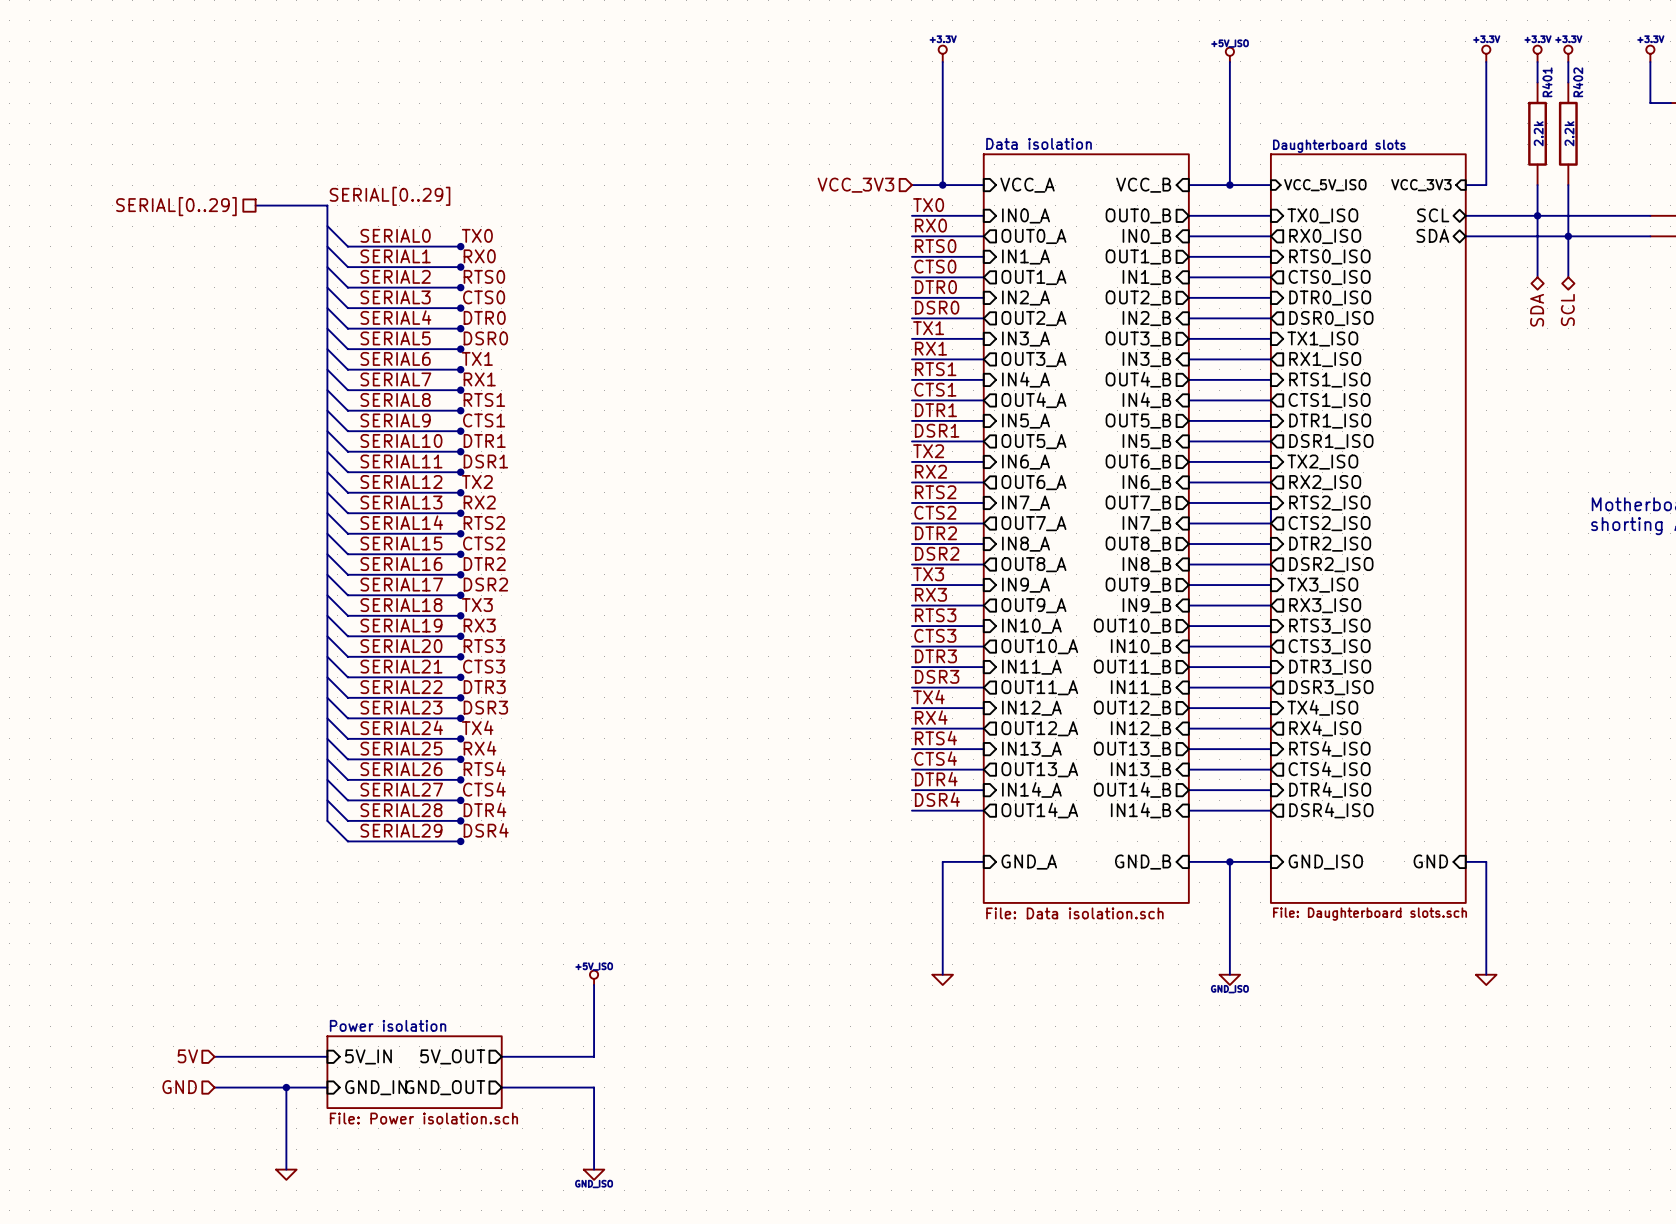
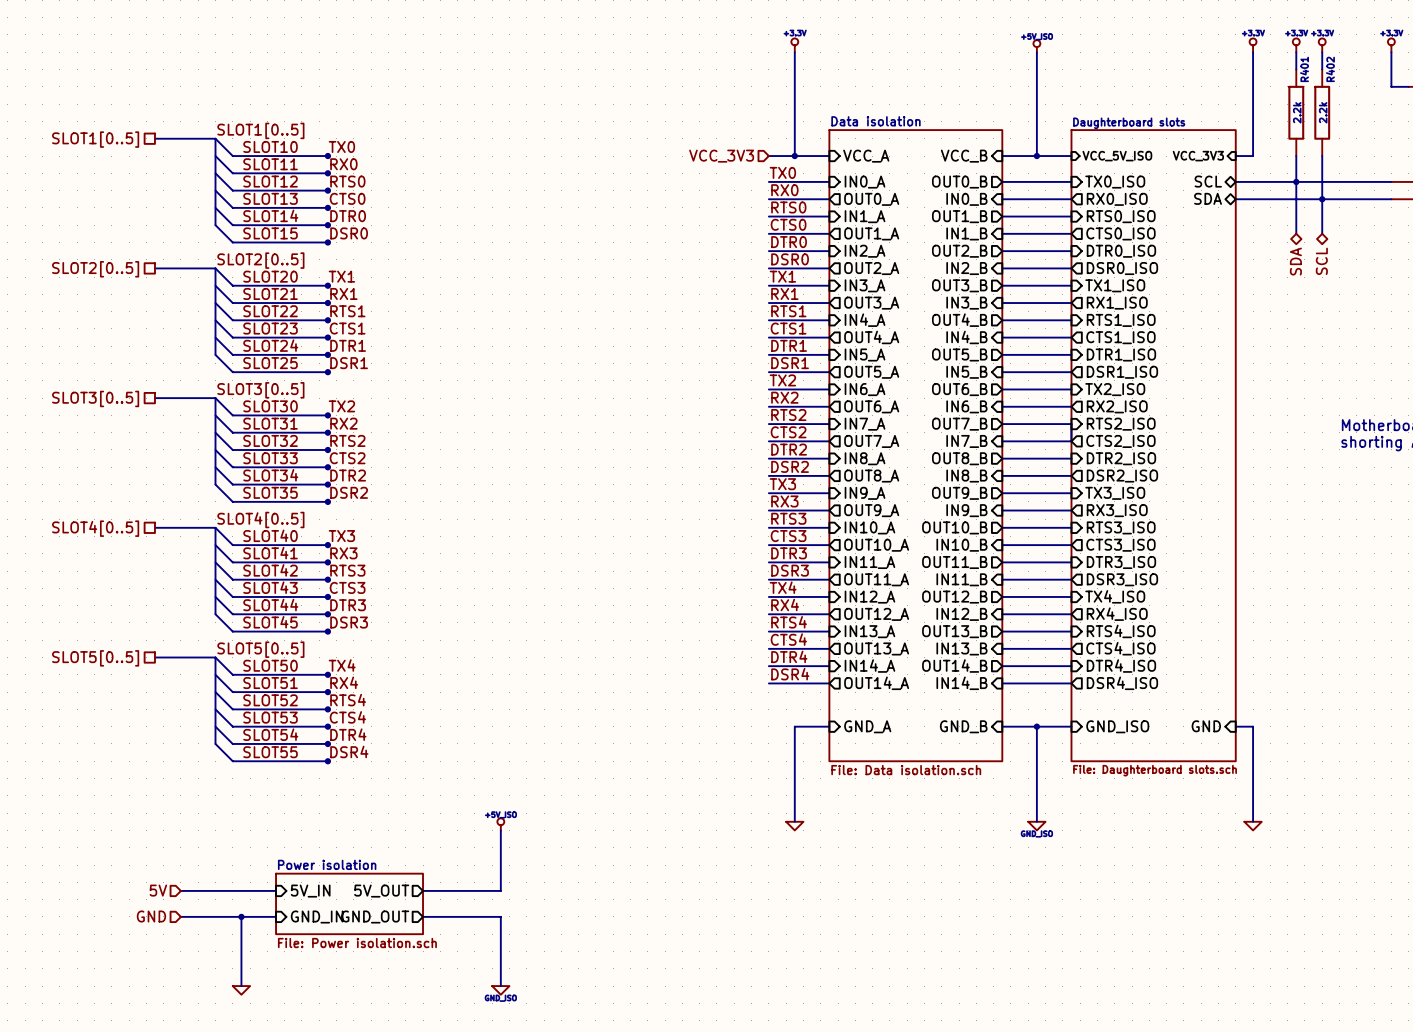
label: none -> SLOT1[0..5] (260, 130)
bus: none -> (154, 138) (215, 138) (215, 225)
hierarchical label: none -> SLOT1[0..5] (95, 139)
label: none -> SLOT10 (270, 146)
wire: none -> (215, 156) (232, 173) (327, 173)
junction: none -> (327, 156)
label: none -> SLOT11 (270, 164)
label: SERIAL[0..29] (390, 196) -> none
wire: none -> (215, 173) (232, 190) (327, 190)
bus: (255, 205) (327, 205) (327, 820) -> none
junction: none -> (327, 173)
hierarchical label: SERIAL[0..29] (176, 206) -> none
label: none -> SLOT12 (270, 181)
wire: (327, 226) (347, 246) -> (215, 190) (232, 207) (293, 207)
junction: none -> (327, 190)
label: none -> SLOT13 (270, 198)
label: SERIAL0 (395, 235) -> none
label position: TX0 (477, 235) -> TX0 (341, 146)
wire: (327, 246) (347, 267) -> (215, 207) (232, 225) (293, 225)
wire: (388, 246) (460, 246) -> none
junction: none -> (327, 207)
junction: (460, 246) -> none
label: none -> SLOT14 (270, 215)
label: SERIAL1 (395, 256) -> none
label position: RX0 (479, 256) -> RX0 (343, 164)
wire: (327, 267) (347, 287) -> (215, 225) (232, 242) (293, 242)
wire: (388, 267) (460, 267) -> none
junction: none -> (327, 225)
junction: (460, 267) -> none
label: none -> SLOT15 (270, 233)
label: SERIAL2 (395, 276) -> none
label position: RTS0 (484, 276) -> RTS0 (347, 181)
wire: (327, 287) (347, 308) (460, 308) -> (215, 138) (232, 156) (327, 156)
wire: (388, 287) (460, 287) -> none
junction: none -> (327, 242)
junction: (460, 287) -> none
label: SERIAL3 (395, 297) -> none
label position: CTS0 (484, 297) -> CTS0 (347, 198)
wire: (327, 308) (347, 328) (460, 328) -> (215, 268) (232, 285) (327, 285)
junction: (460, 308) -> none
label: none -> SLOT2[0..5] (260, 260)
label: SERIAL4 (395, 317) -> none
label position: DTR0 (484, 317) -> DTR0 (348, 216)
bus: none -> (154, 268) (215, 268) (215, 354)
hierarchical label: none -> SLOT2[0..5] (95, 269)
label: none -> SLOT20 (270, 276)
wire: (327, 328) (347, 349) (460, 349) -> (215, 285) (232, 303) (327, 303)
junction: (460, 328) -> none
junction: none -> (327, 285)
label: SERIAL5 (395, 338) -> none
label position: DSR0 (485, 338) -> DSR0 (349, 233)
label: none -> SLOT21 (270, 293)
wire: (327, 349) (347, 369) (460, 369) -> (215, 303) (232, 320) (327, 320)
junction: (460, 349) -> none
label: SERIAL6 (395, 358) -> none
label position: TX1 (477, 358) -> TX1 (341, 276)
junction: none -> (327, 303)
label: none -> SLOT22 (270, 311)
wire: (327, 369) (347, 390) (460, 390) -> (215, 320) (232, 337) (327, 337)
junction: (460, 369) -> none
junction: none -> (327, 320)
label: SERIAL7 (395, 379) -> none
label position: RX1 (479, 379) -> RX1 (343, 293)
label: none -> SLOT23 (270, 328)
wire: (327, 390) (347, 410) (460, 410) -> (215, 337) (232, 354) (327, 354)
junction: (460, 390) -> none
label: SERIAL8 (395, 399) -> none
label position: RTS1 (484, 399) -> RTS1 (347, 311)
junction: none -> (327, 337)
label: none -> SLOT24 (270, 345)
wire: (327, 410) (347, 431) (460, 431) -> (215, 354) (232, 372) (327, 372)
junction: (460, 410) -> none
junction: none -> (327, 354)
label: SERIAL9 (395, 420) -> none
label position: CTS1 (484, 420) -> CTS1 (347, 328)
label: none -> SLOT25 (270, 363)
wire: (327, 431) (347, 451) (460, 451) -> none
junction: (460, 431) -> none
label: SERIAL10 (401, 440) -> none
label position: DTR1 (484, 440) -> DTR1 (348, 345)
junction: none -> (327, 372)
wire: (327, 451) (347, 472) (460, 472) -> none
junction: (460, 451) -> none
label: SERIAL11 (401, 461) -> none
label position: DSR1 (485, 461) -> DSR1 (349, 363)
label: none -> SLOT3[0..5] (260, 390)
bus: none -> (154, 398) (215, 398) (215, 484)
wire: (327, 472) (347, 492) -> (215, 398) (232, 415) (293, 415)
junction: (460, 472) -> none
hierarchical label: none -> SLOT3[0..5] (95, 398)
label: none -> SLOT30 (270, 406)
label: SERIAL12 (401, 481) -> none
label position: TX2 (477, 481) -> TX2 (341, 406)
wire: (327, 492) (347, 513) -> (215, 415) (232, 432) (293, 432)
wire: (388, 492) (460, 492) -> none
junction: none -> (327, 415)
junction: (460, 492) -> none
label: none -> SLOT31 (270, 423)
label: SERIAL13 (401, 502) -> none
label position: RX2 (479, 502) -> RX2 (343, 423)
wire: (327, 513) (347, 533) -> (215, 432) (232, 449) (293, 449)
wire: (388, 513) (460, 513) -> none
junction: none -> (327, 432)
junction: (460, 513) -> none
label: SERIAL14 (401, 522) -> none
label: none -> SLOT32 (270, 440)
label position: RTS2 (484, 523) -> RTS2 (347, 440)
wire: (327, 533) (347, 554) -> (215, 449) (232, 467) (293, 467)
wire: (388, 533) (460, 533) -> none
junction: none -> (327, 449)
junction: (460, 533) -> none
label: none -> SLOT33 (270, 458)
label: SERIAL15 (401, 543) -> none
label position: CTS2 (484, 543) -> CTS2 (347, 458)
wire: (327, 554) (347, 574) -> (215, 467) (232, 484) (293, 484)
wire: (388, 554) (460, 554) -> none
junction: none -> (327, 467)
junction: (460, 554) -> none
label: none -> SLOT34 (270, 475)
label: SERIAL16 (401, 564) -> none
label position: DTR2 (484, 564) -> DTR2 (348, 475)
wire: (327, 574) (347, 595) -> (215, 484) (232, 501) (293, 501)
wire: (388, 574) (460, 574) -> none
junction: none -> (327, 484)
junction: (460, 574) -> none
label: none -> SLOT35 (270, 492)
label: SERIAL17 (401, 584) -> none
label position: DSR2 (485, 584) -> DSR2 (349, 492)
wire: (327, 595) (347, 615) (460, 615) -> none
wire: (388, 595) (460, 595) -> none
junction: none -> (327, 501)
junction: (460, 595) -> none
label: SERIAL18 (401, 605) -> none
label position: TX3 (477, 605) -> TX3 (341, 536)
wire: (327, 615) (347, 636) (460, 636) -> (215, 527) (232, 545) (327, 545)
junction: (460, 615) -> none
label: none -> SLOT4[0..5] (260, 519)
label: SERIAL19 (401, 625) -> none
label position: RX3 (479, 625) -> RX3 (343, 553)
bus: none -> (154, 527) (215, 527) (215, 614)
hierarchical label: none -> SLOT4[0..5] (95, 528)
label: none -> SLOT40 (270, 535)
wire: (327, 636) (347, 656) (460, 656) -> (215, 545) (232, 562) (327, 562)
junction: (460, 636) -> none
junction: none -> (327, 545)
label: SERIAL20 (401, 646) -> none
label position: RTS3 (484, 646) -> RTS3 (347, 570)
label: none -> SLOT41 (270, 553)
wire: (327, 656) (347, 677) (460, 677) -> (215, 562) (232, 579) (327, 579)
junction: (460, 656) -> none
label: SERIAL21 (401, 666) -> none
label position: CTS3 (484, 666) -> CTS3 (347, 587)
junction: none -> (327, 562)
label: none -> SLOT42 (270, 570)
wire: (327, 677) (347, 697) (460, 697) -> (215, 579) (232, 596) (327, 596)
junction: (460, 677) -> none
junction: none -> (327, 579)
label: SERIAL22 (401, 687) -> none
label position: DTR3 (484, 687) -> DTR3 (348, 605)
label: none -> SLOT43 (270, 587)
wire: (327, 697) (347, 718) (460, 718) -> (215, 596) (232, 614) (327, 614)
junction: (460, 697) -> none
label: SERIAL23 (401, 707) -> none
label position: DSR3 (485, 707) -> DSR3 (349, 622)
junction: none -> (327, 596)
label: none -> SLOT44 (270, 604)
wire: (327, 718) (347, 738) (460, 738) -> (215, 614) (232, 631) (327, 631)
junction: (460, 718) -> none
label: SERIAL24 (401, 727) -> none
label position: TX4 (477, 727) -> TX4 (342, 665)
junction: none -> (327, 614)
label: none -> SLOT45 (270, 622)
wire: (327, 738) (347, 759) (460, 759) -> (215, 726) (232, 743) (327, 743)
junction: (460, 738) -> none
label: SERIAL25 (401, 748) -> none
label position: RX4 (479, 748) -> RX4 (344, 682)
junction: none -> (327, 631)
wire: (327, 759) (347, 779) (460, 779) -> (215, 743) (232, 761) (327, 761)
junction: (460, 759) -> none
label position: RTS4 (484, 768) -> RTS4 (348, 700)
label: SERIAL26 (401, 769) -> none
label: none -> SLOT5[0..5] (260, 649)
bus: none -> (154, 657) (215, 657) (215, 743)
wire: (327, 779) (347, 800) -> (215, 657) (232, 674) (293, 674)
junction: (460, 779) -> none
hierarchical label: none -> SLOT5[0..5] (95, 658)
label: none -> SLOT50 (270, 665)
label: SERIAL27 (401, 789) -> none
label position: CTS4 (484, 789) -> CTS4 (347, 717)
wire: (327, 800) (347, 820) -> (215, 674) (232, 692) (293, 692)
wire: (388, 800) (460, 800) -> none
junction: none -> (327, 674)
junction: (460, 800) -> none
label position: DTR4 (484, 809) -> DTR4 (348, 734)
label: none -> SLOT51 (270, 683)
label: SERIAL28 (401, 810) -> none
wire: (327, 820) (347, 841) -> (215, 692) (232, 709) (293, 709)
wire: (388, 820) (460, 820) -> none
junction: none -> (327, 692)
junction: (460, 820) -> none
label: none -> SLOT52 (270, 700)
label: SERIAL29 (401, 830) -> none
label position: DSR4 (486, 830) -> DSR4 (349, 751)
wire: none -> (215, 709) (232, 726) (327, 726)
wire: (388, 841) (460, 841) -> none
junction: none -> (327, 709)
junction: (460, 841) -> none
label: none -> SLOT53 (270, 717)
junction: none -> (327, 726)
label: none -> SLOT54 (270, 734)
junction: none -> (327, 743)
label: none -> SLOT55 (270, 752)
junction: none -> (327, 761)

